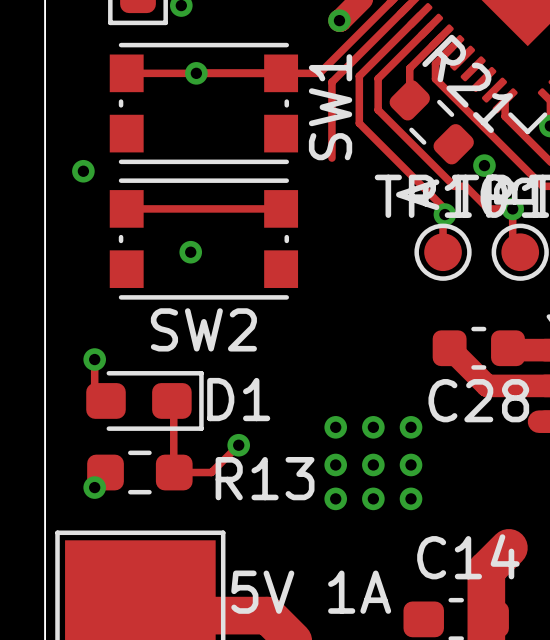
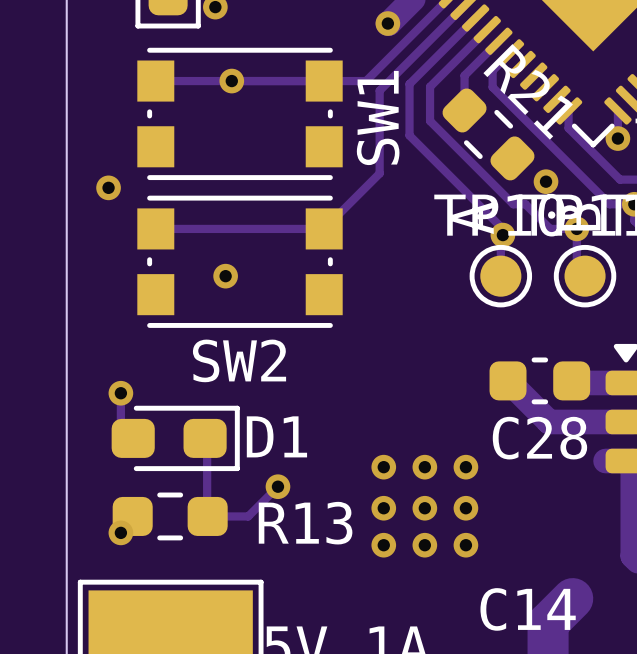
track: none -> (379, 173) (324, 228)

